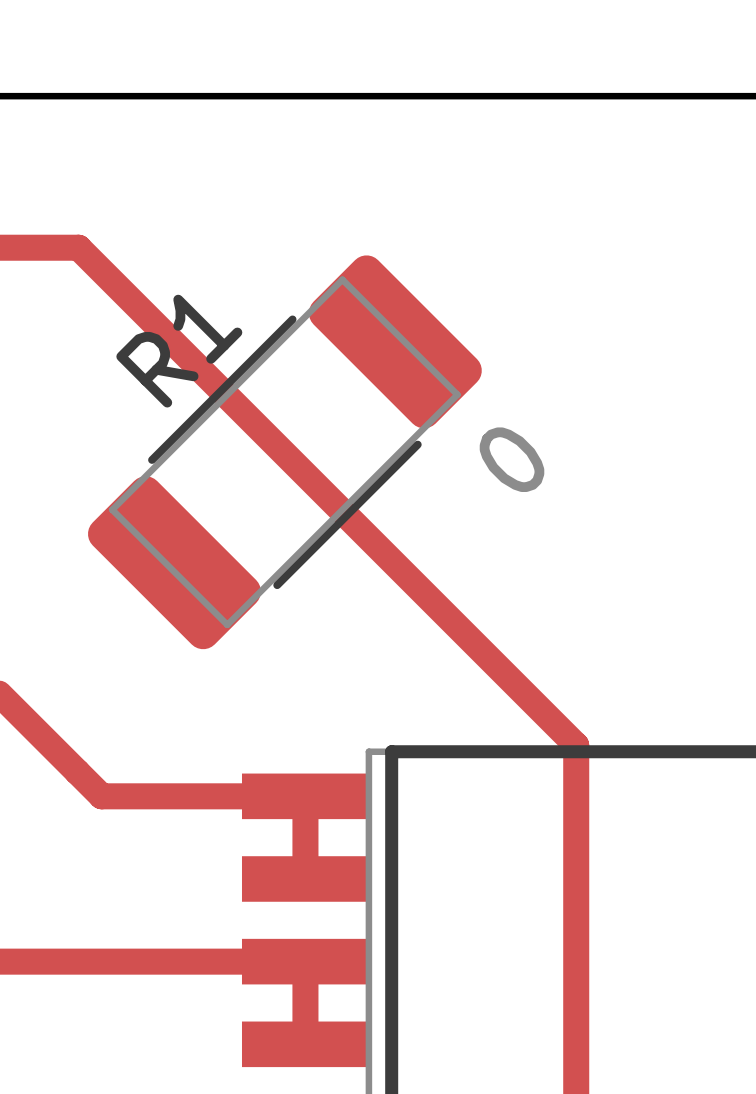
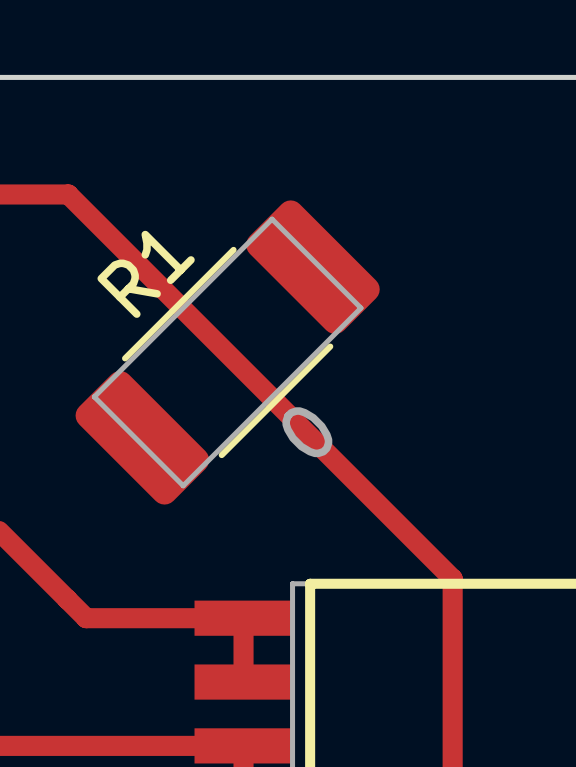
R1 value position: 0 (512, 459) -> 0 (307, 432)

